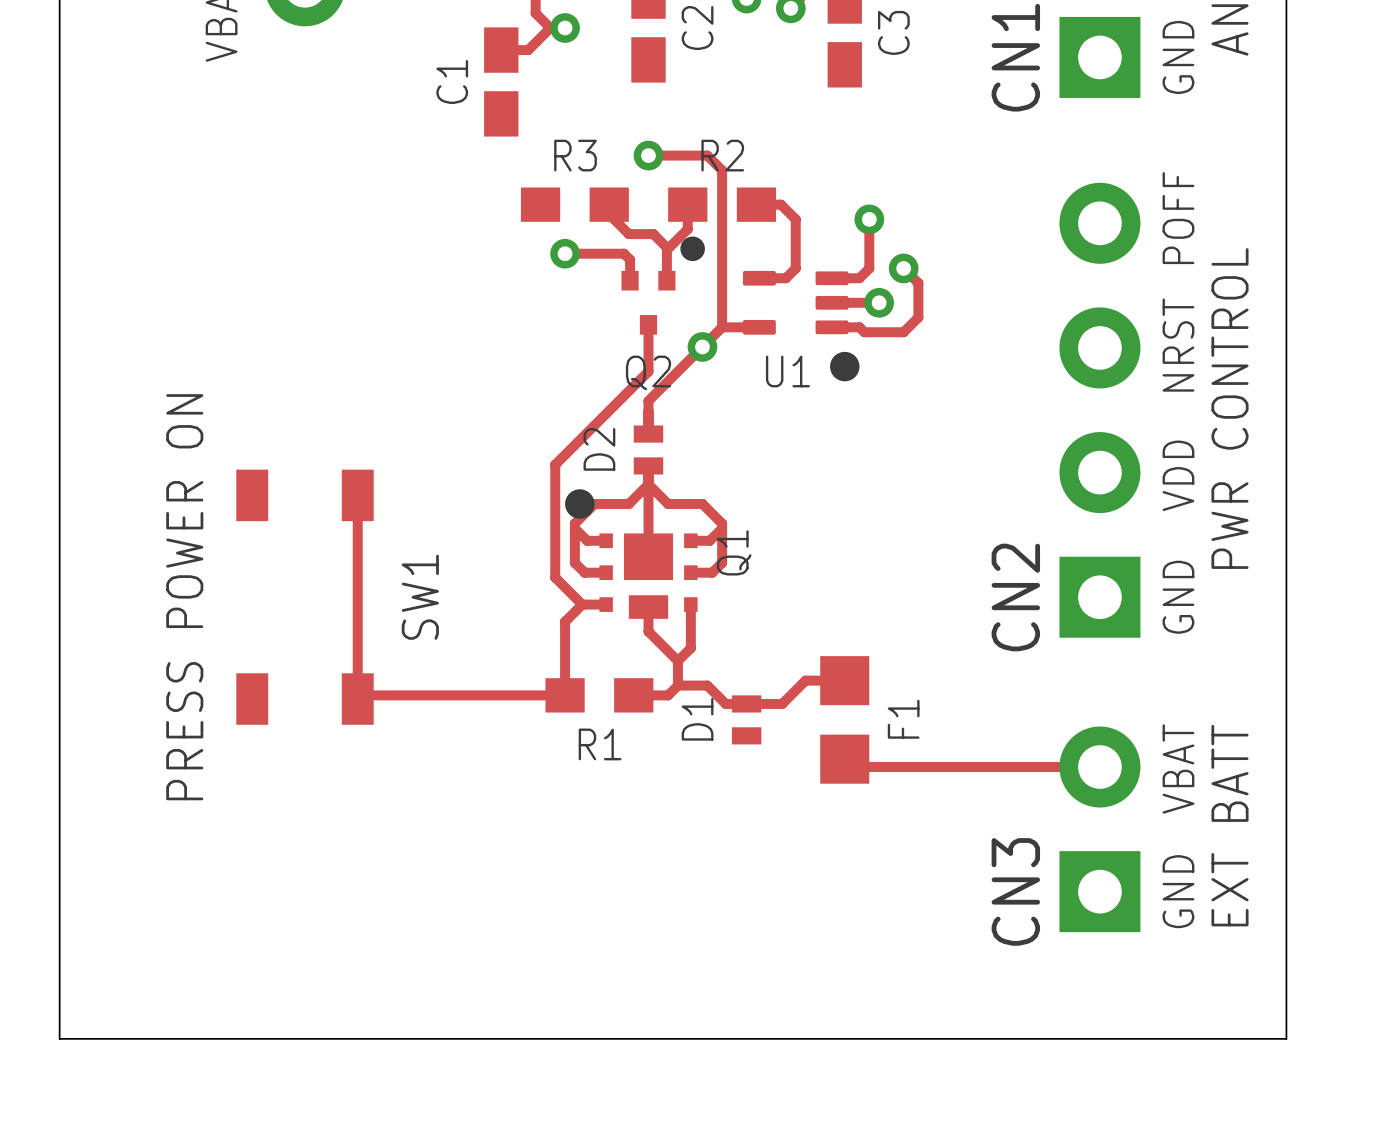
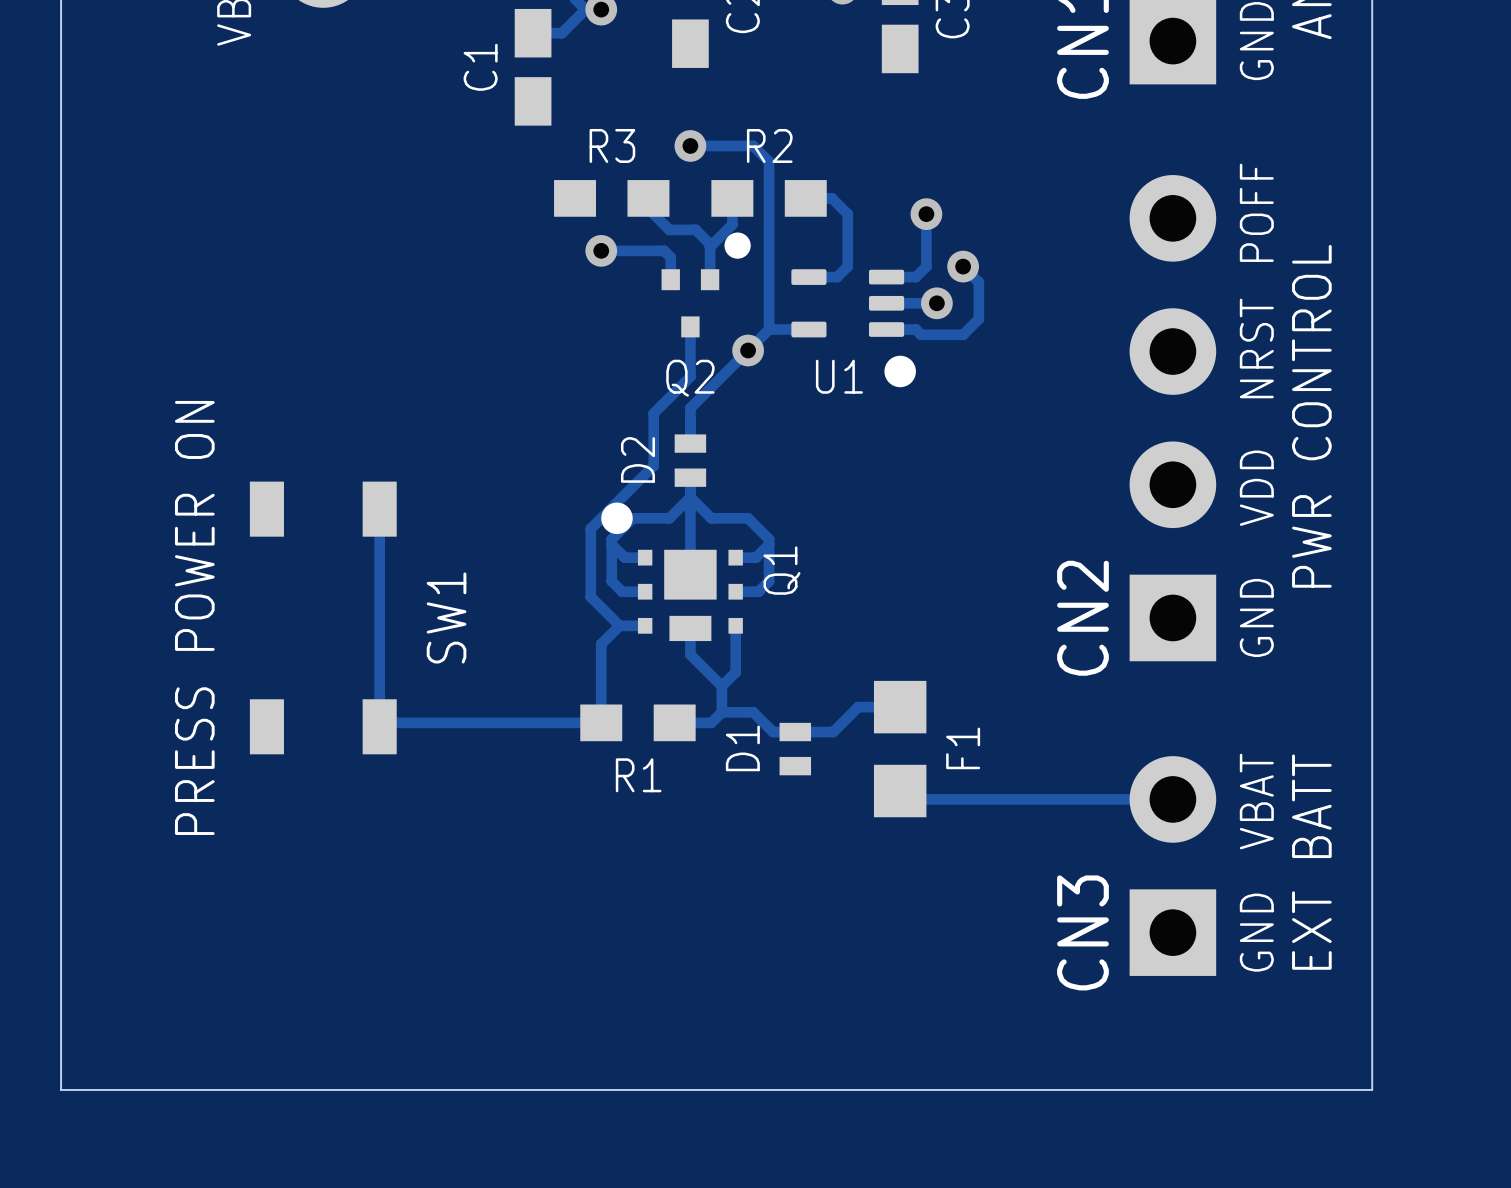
track: (614, 405) (555, 464) (555, 513) -> (653, 413) (653, 465) (590, 528)

